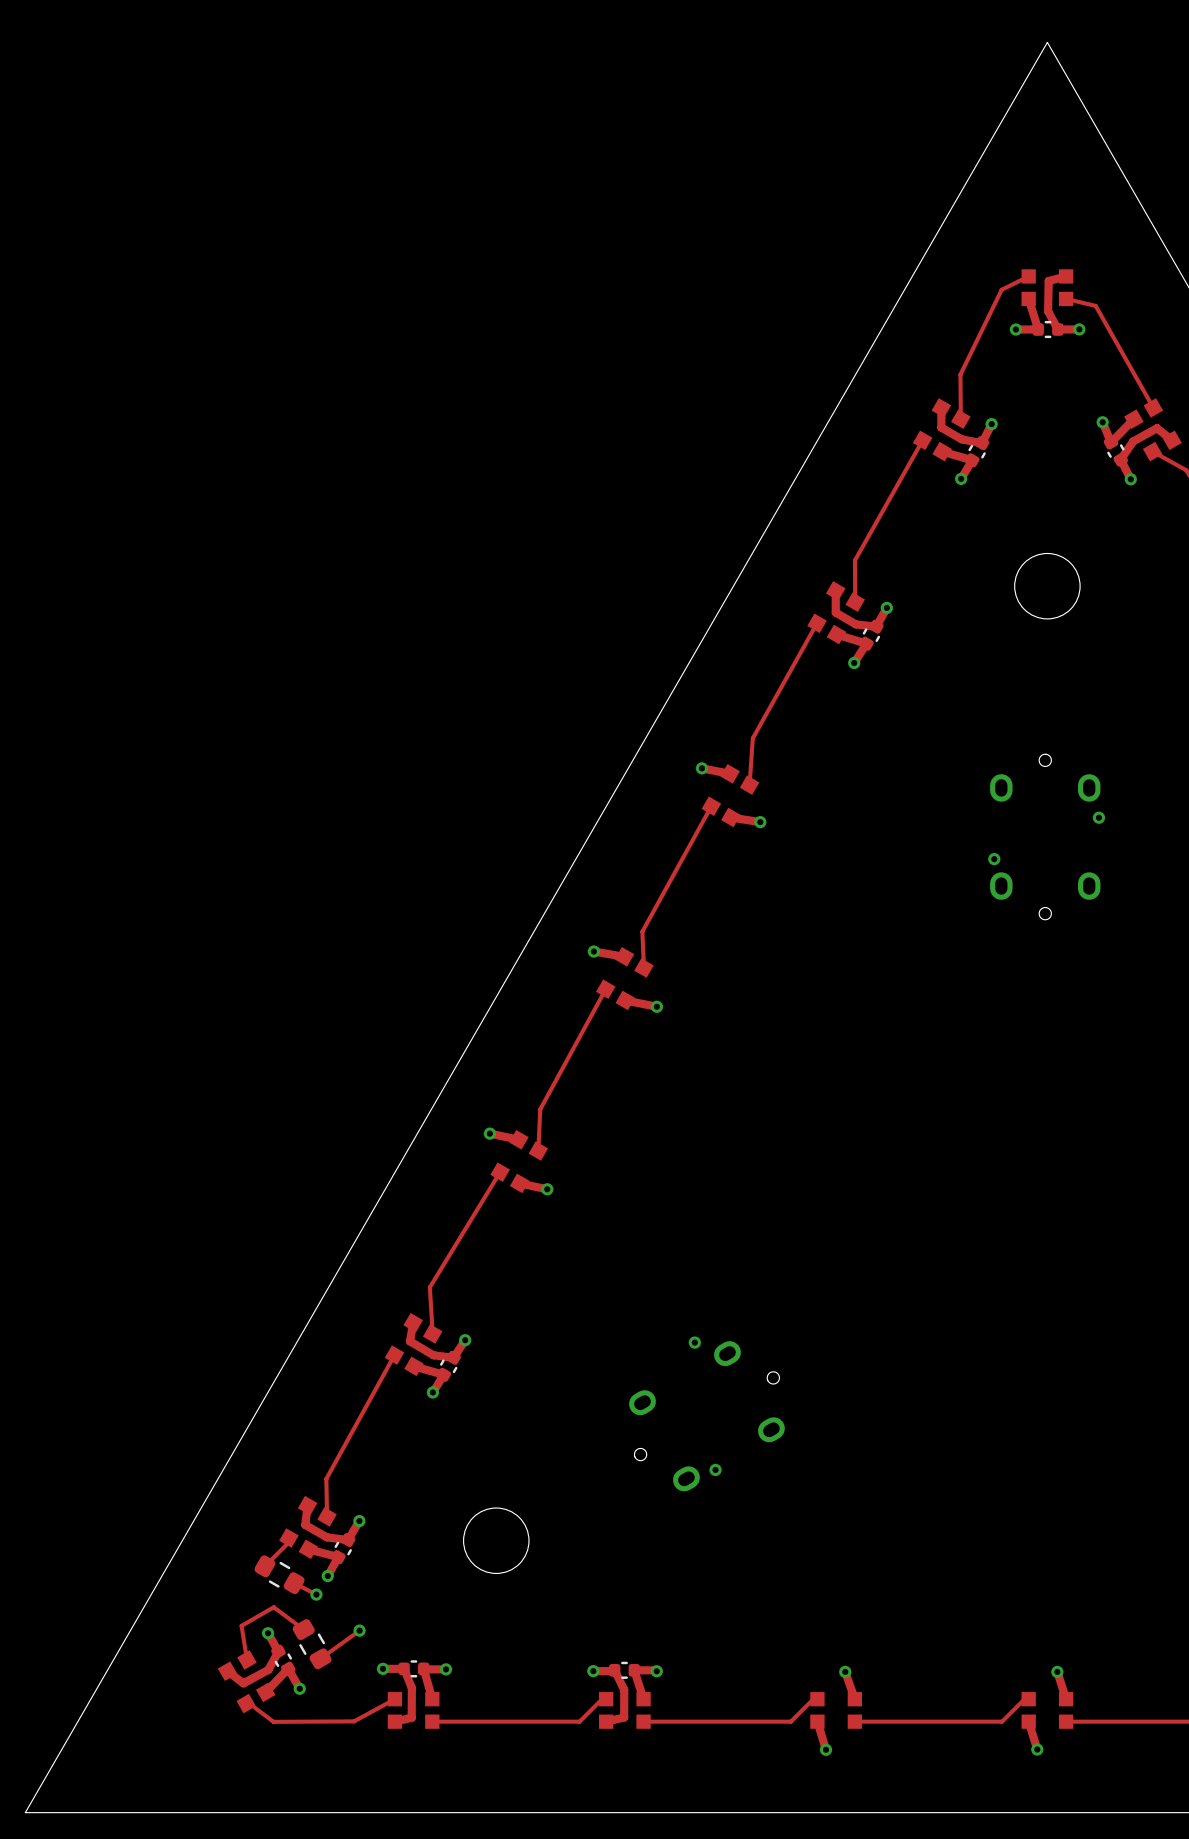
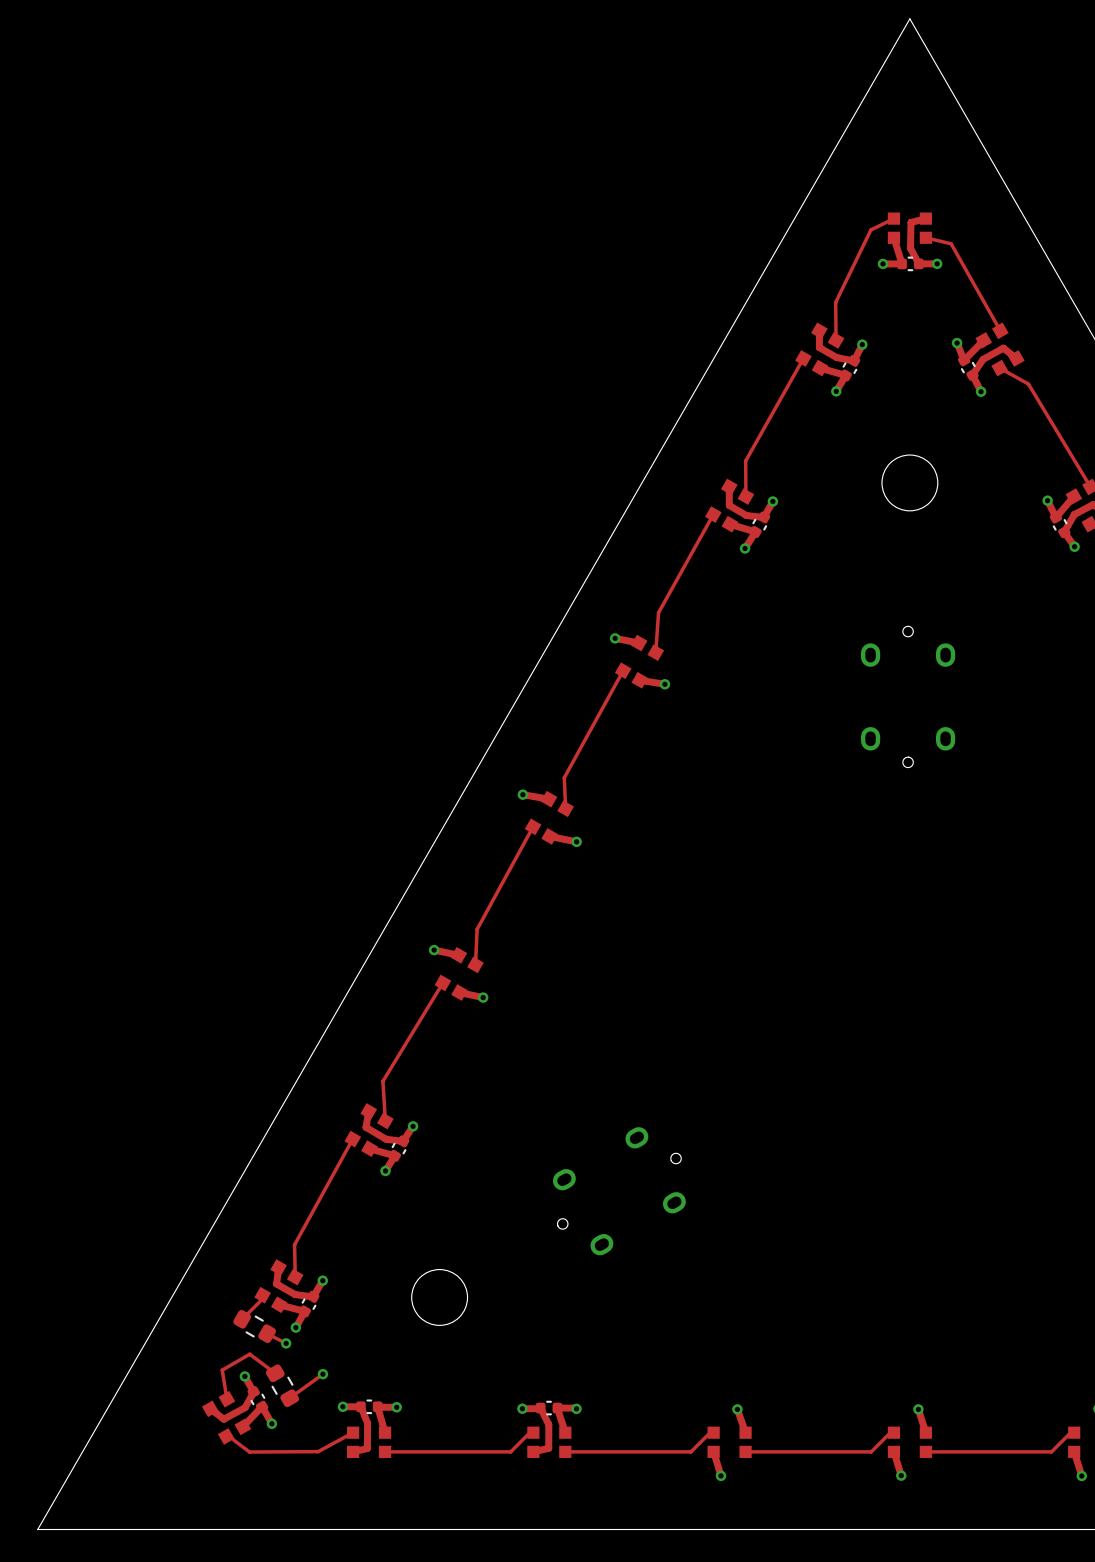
via: (1098, 817) -> none
via: (994, 859) -> none
via: (694, 1342) -> none
via: (715, 1469) -> none

